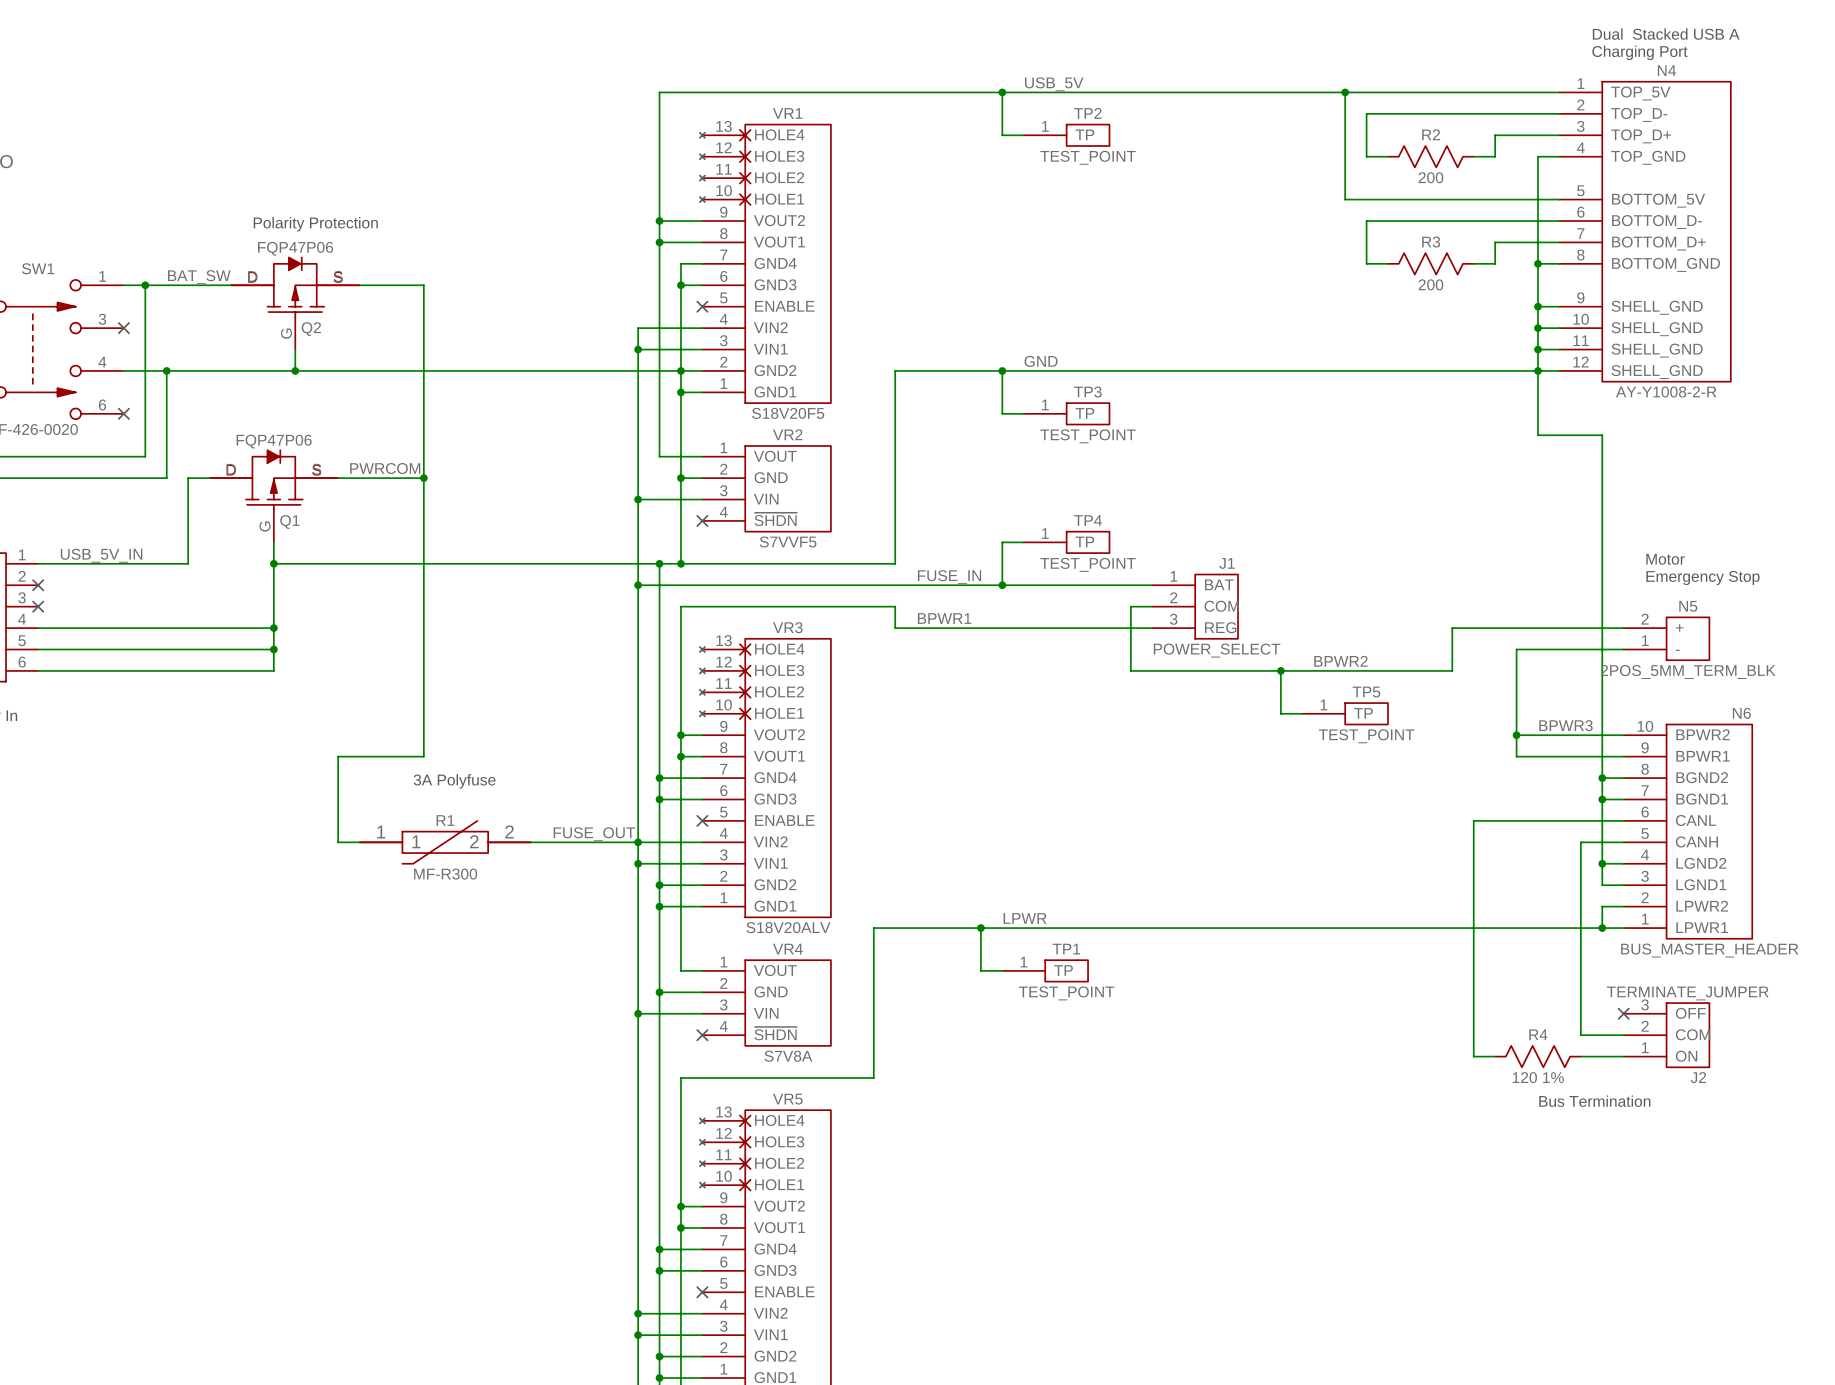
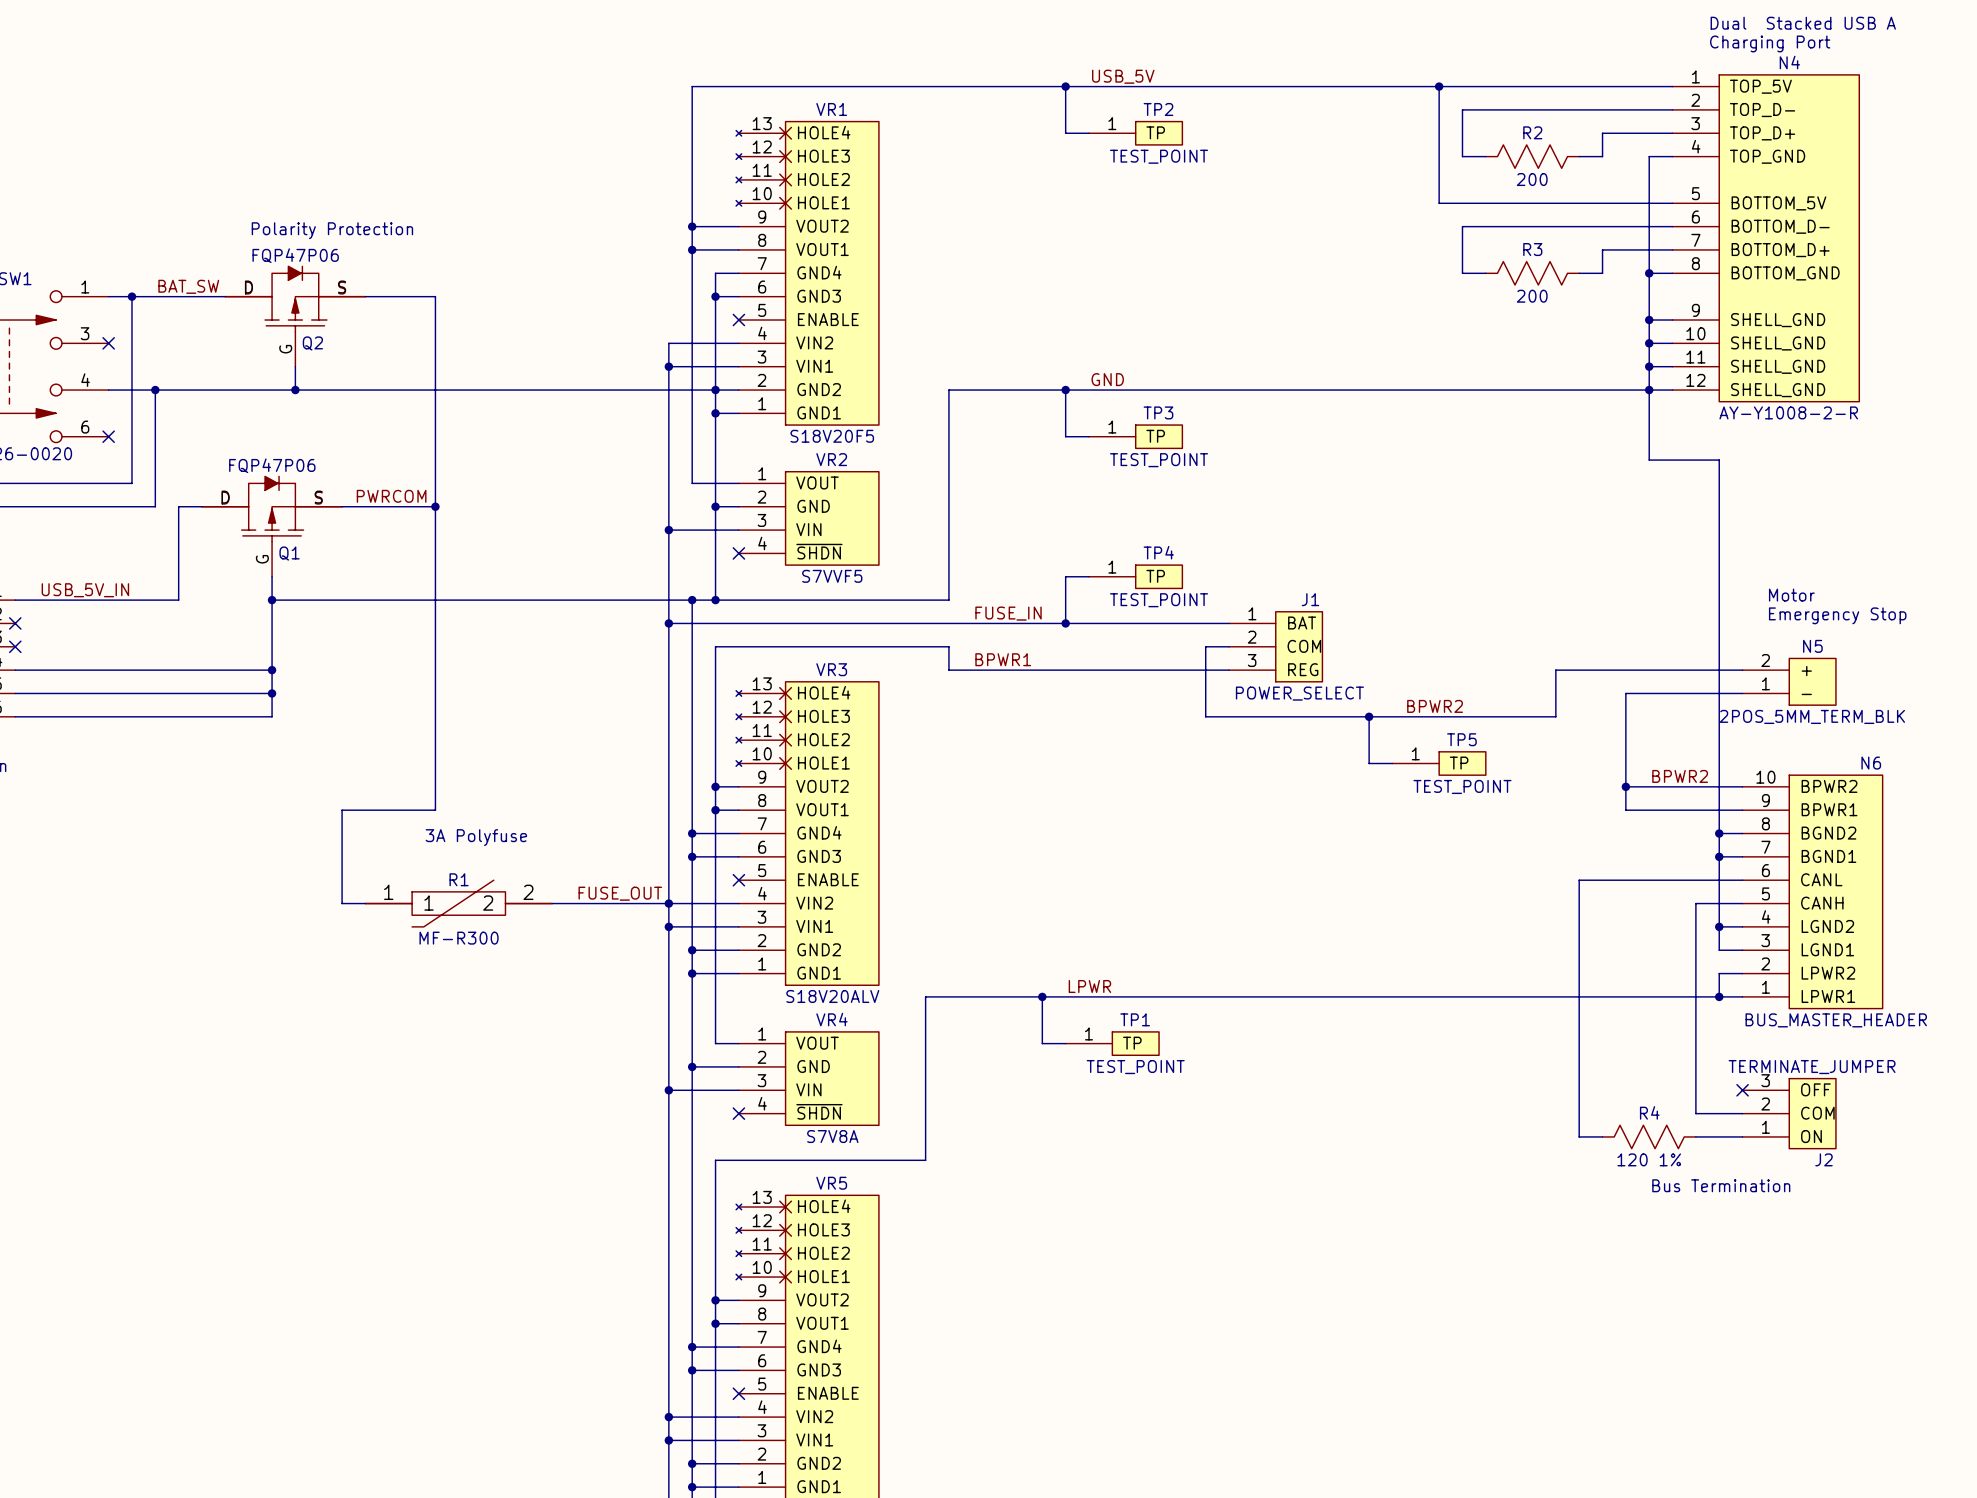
label: BPWR3 (1565, 725) -> BPWR2 (1680, 776)

